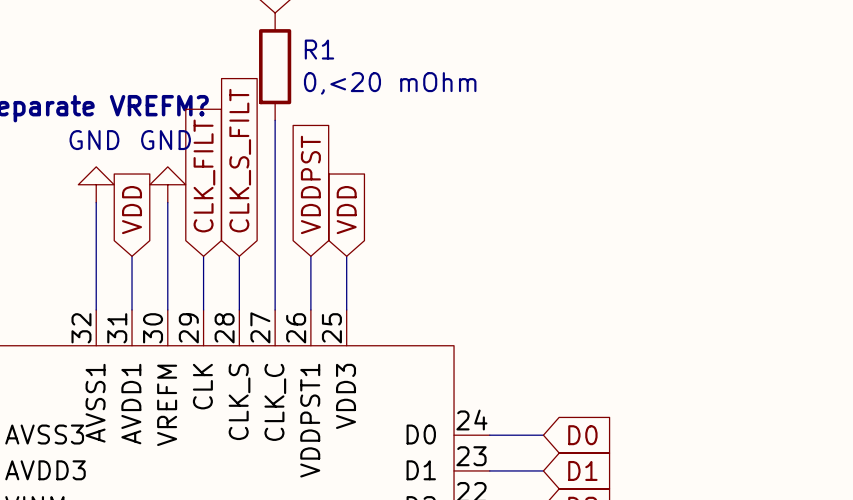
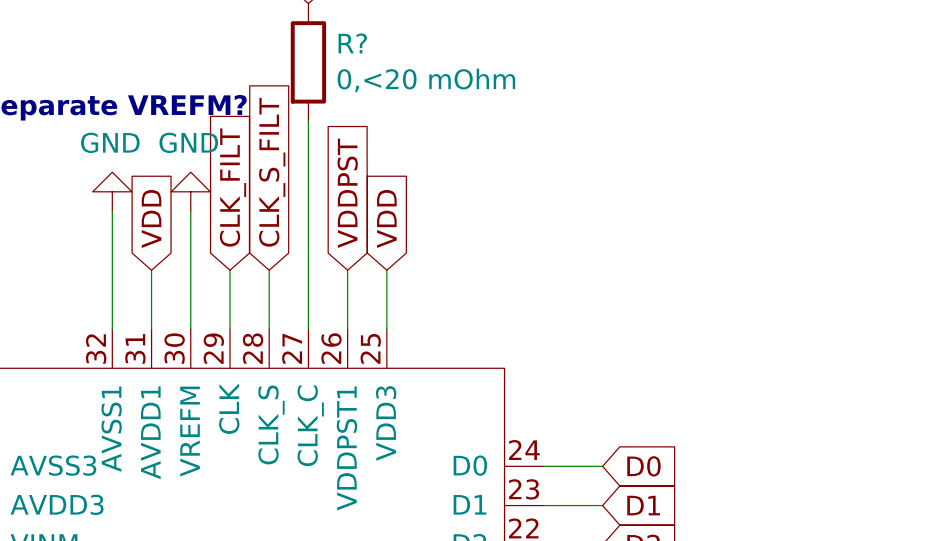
R1 name: R1 (319, 49) -> R? (352, 43)

